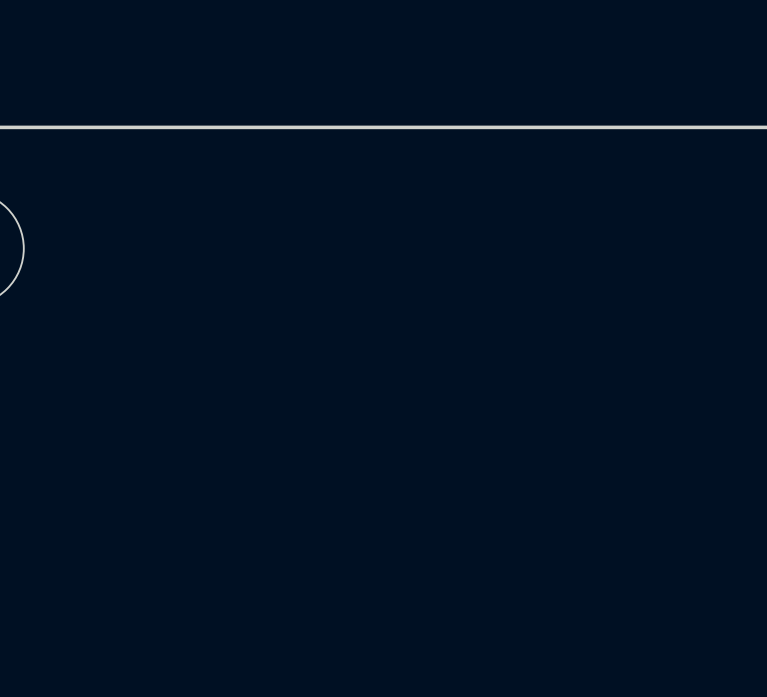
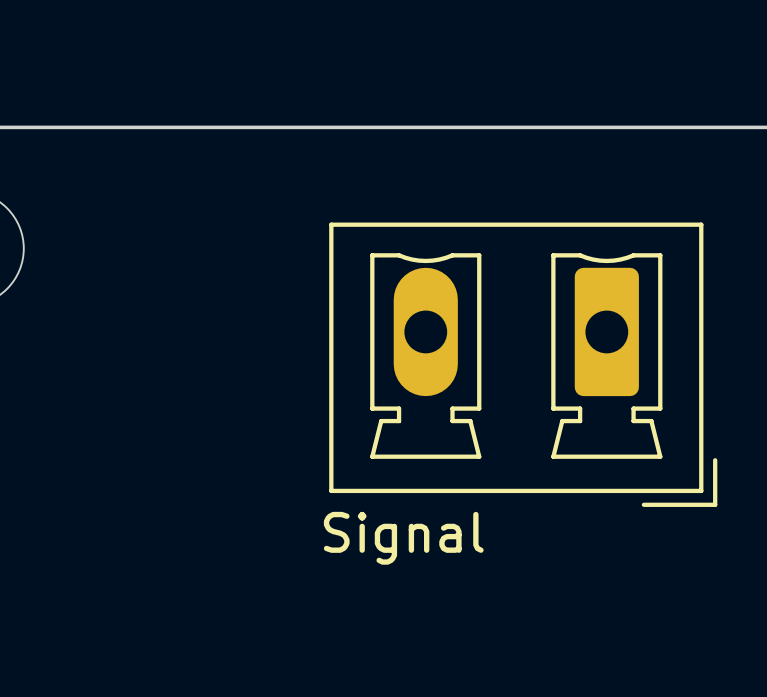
part: none -> Signal (523, 364)

